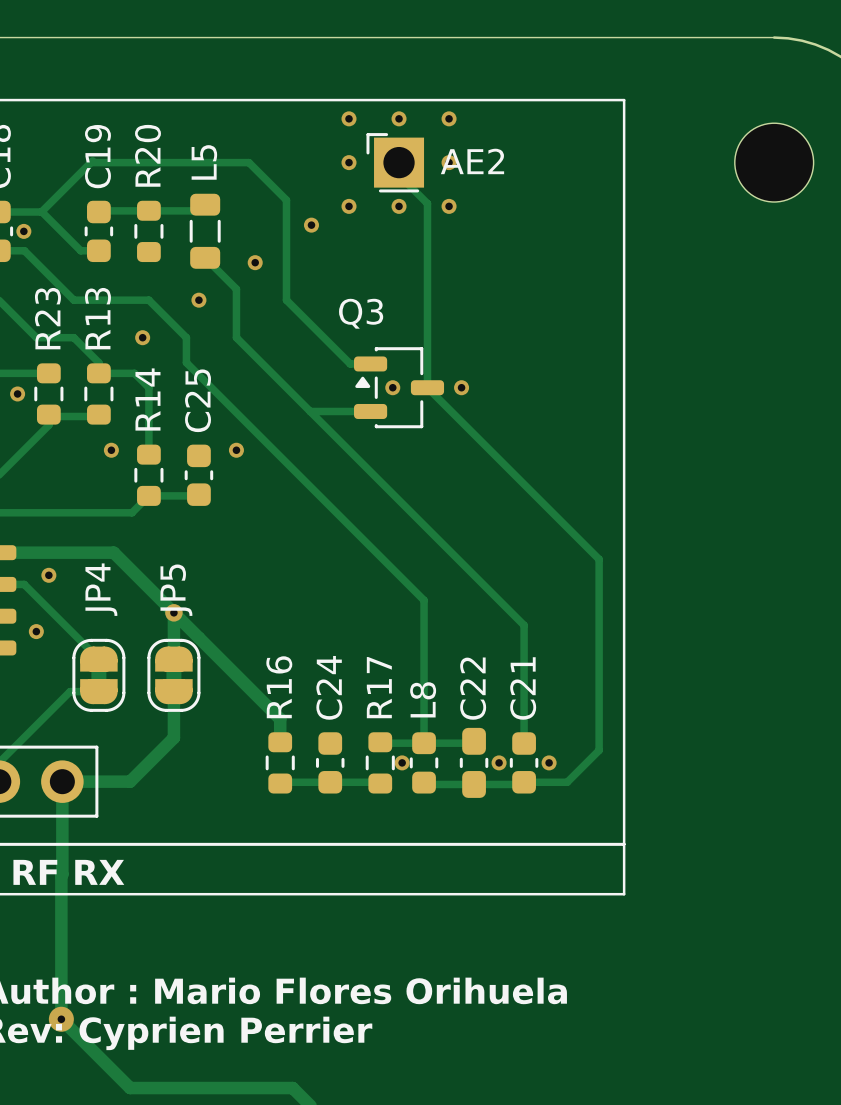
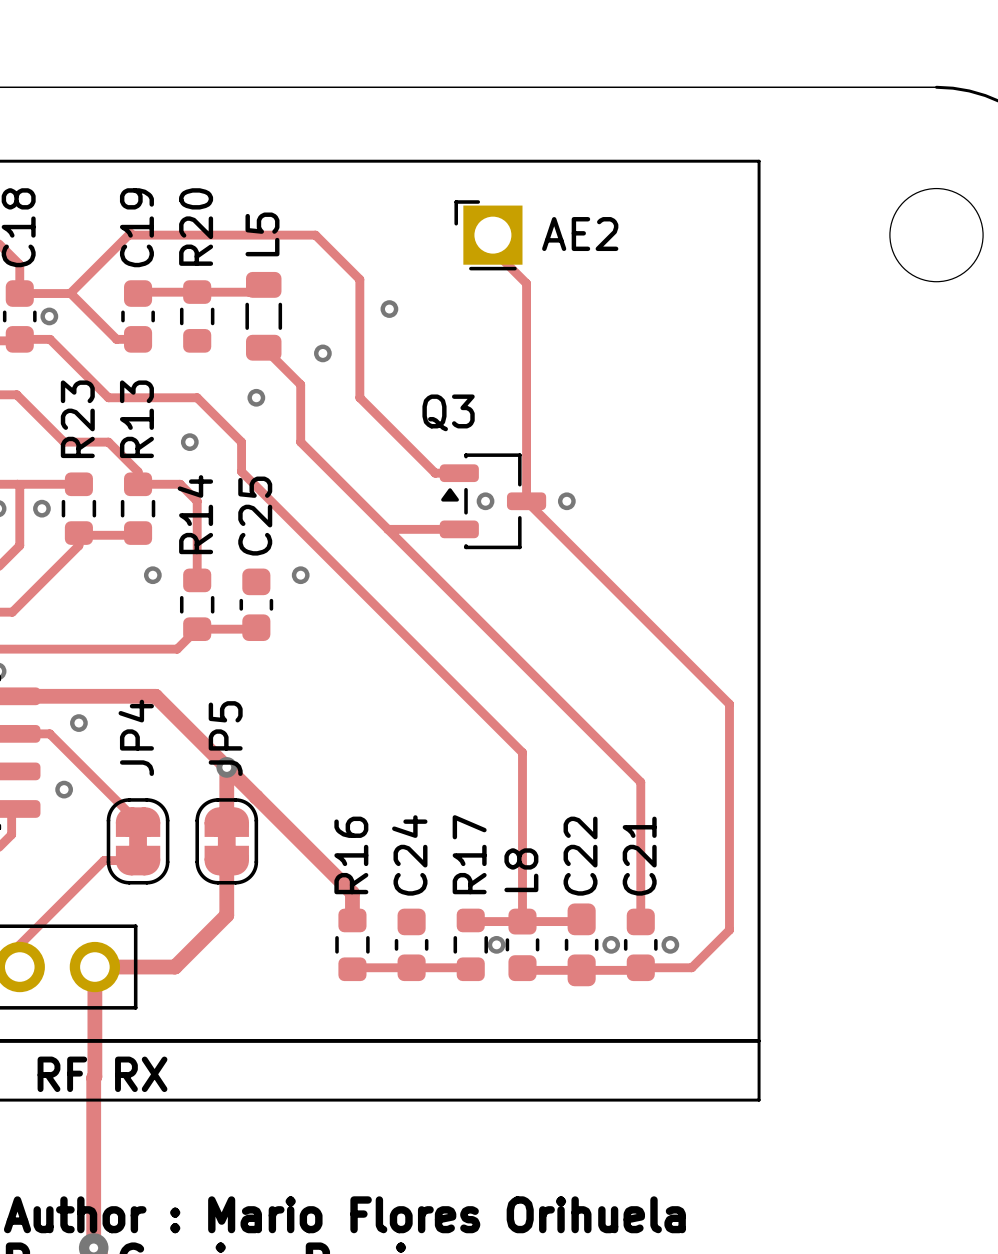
via: (349, 118) -> none
via: (399, 118) -> none
via: (449, 118) -> none
via: (349, 162) -> none
via: (449, 162) -> none
via: (349, 206) -> none
via: (399, 206) -> none
via: (449, 206) -> none

